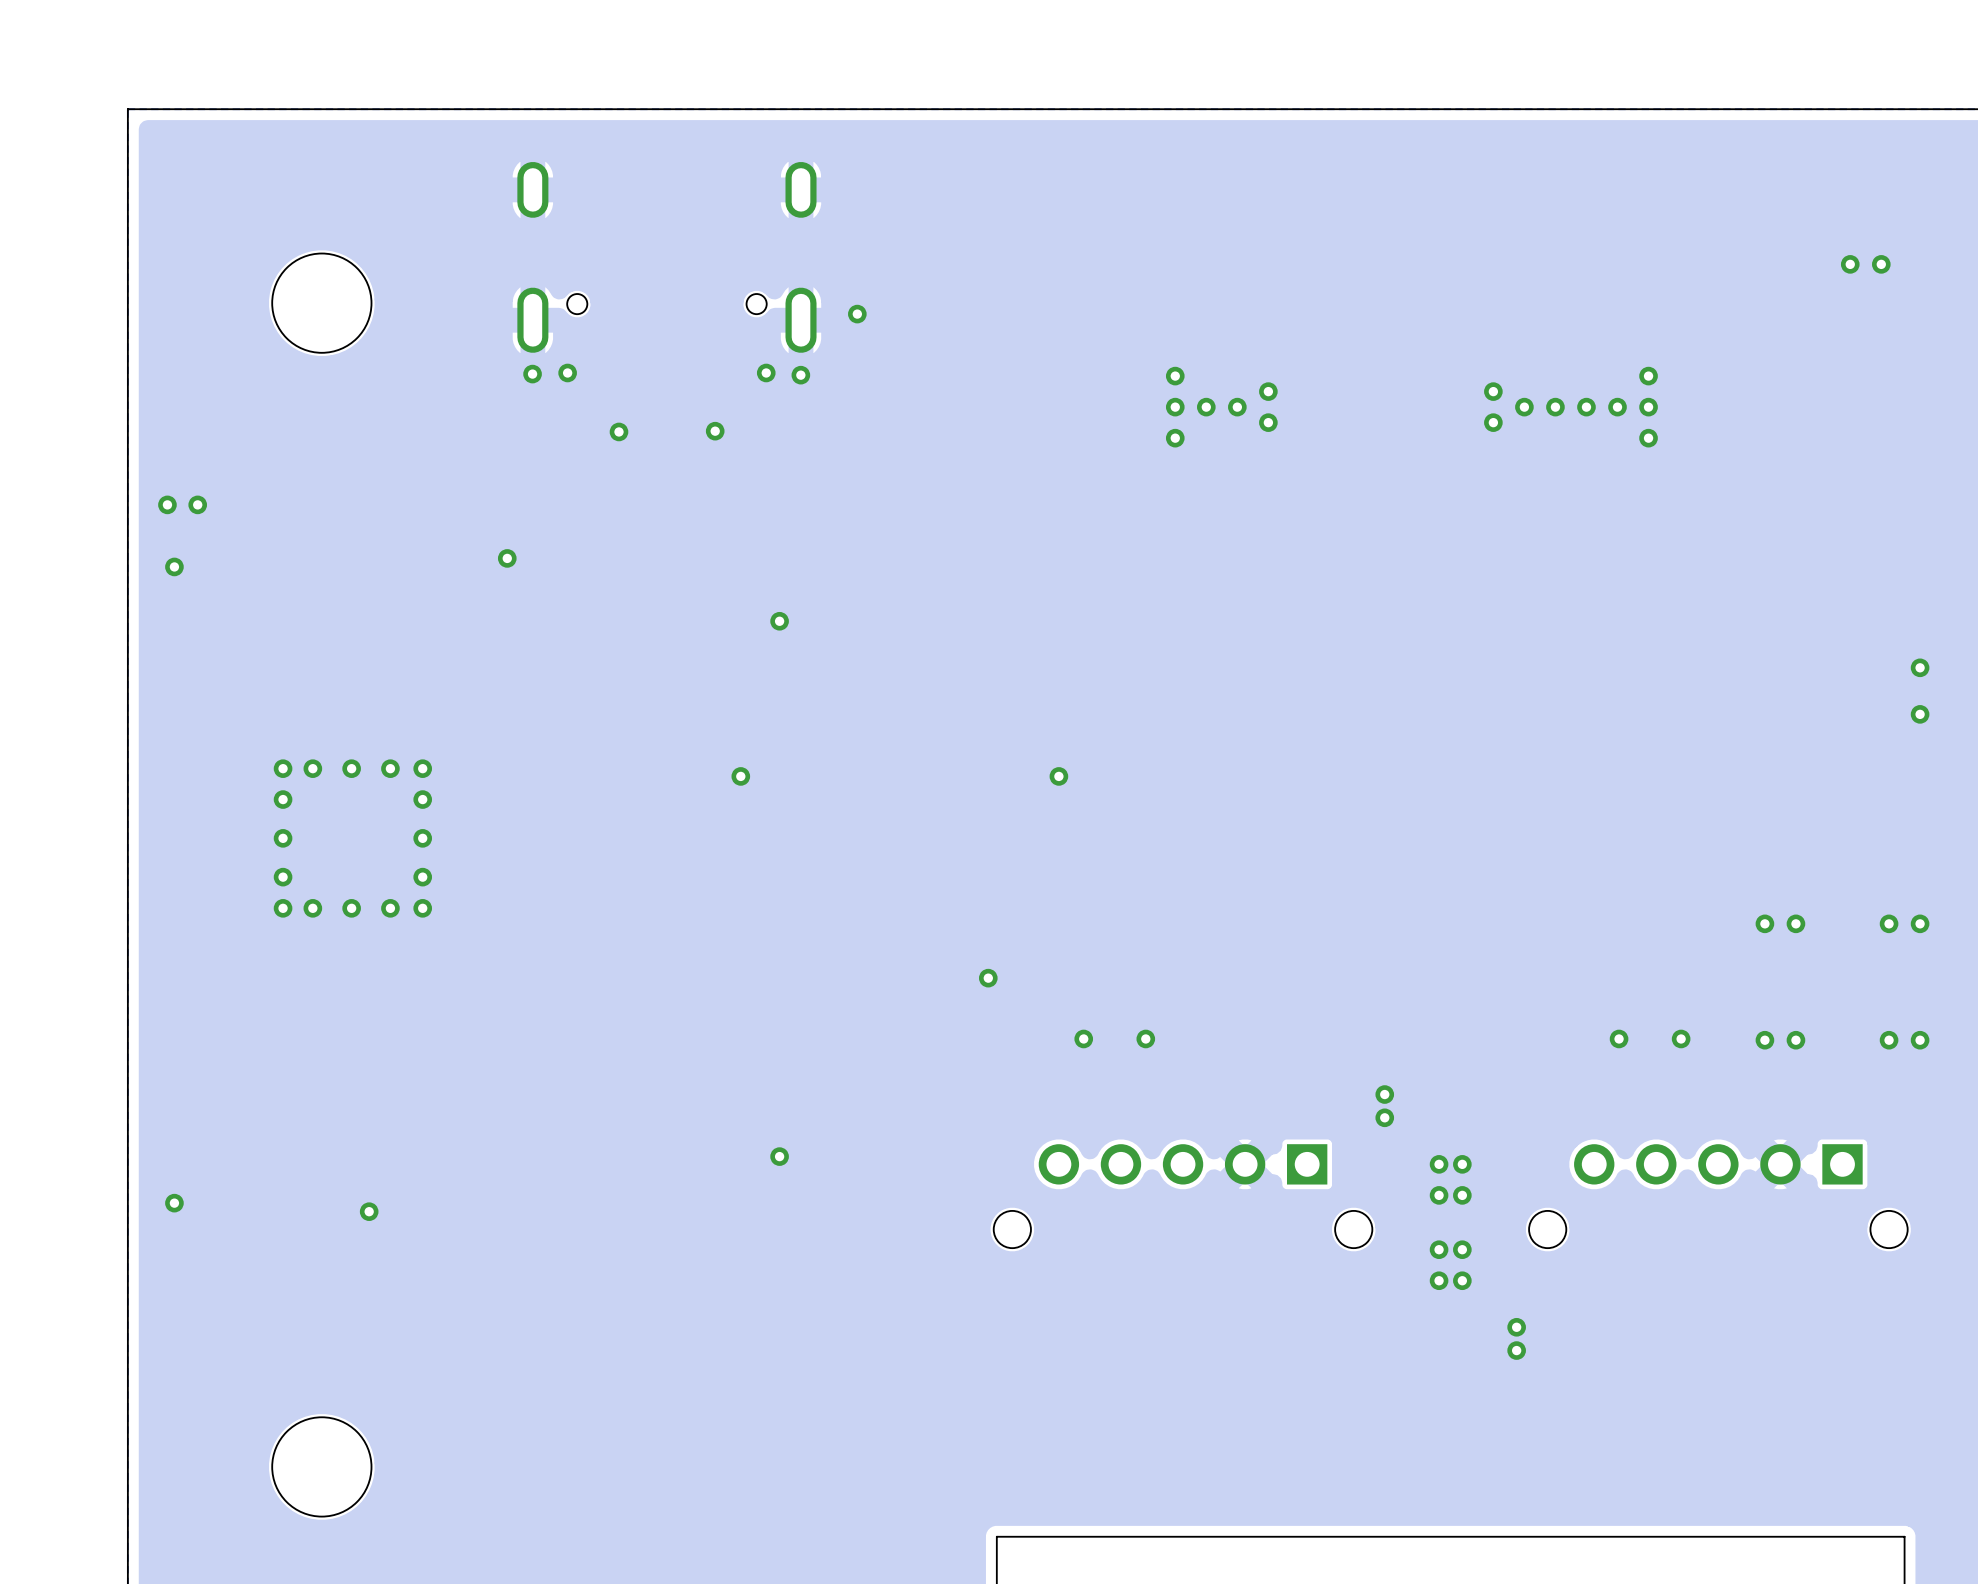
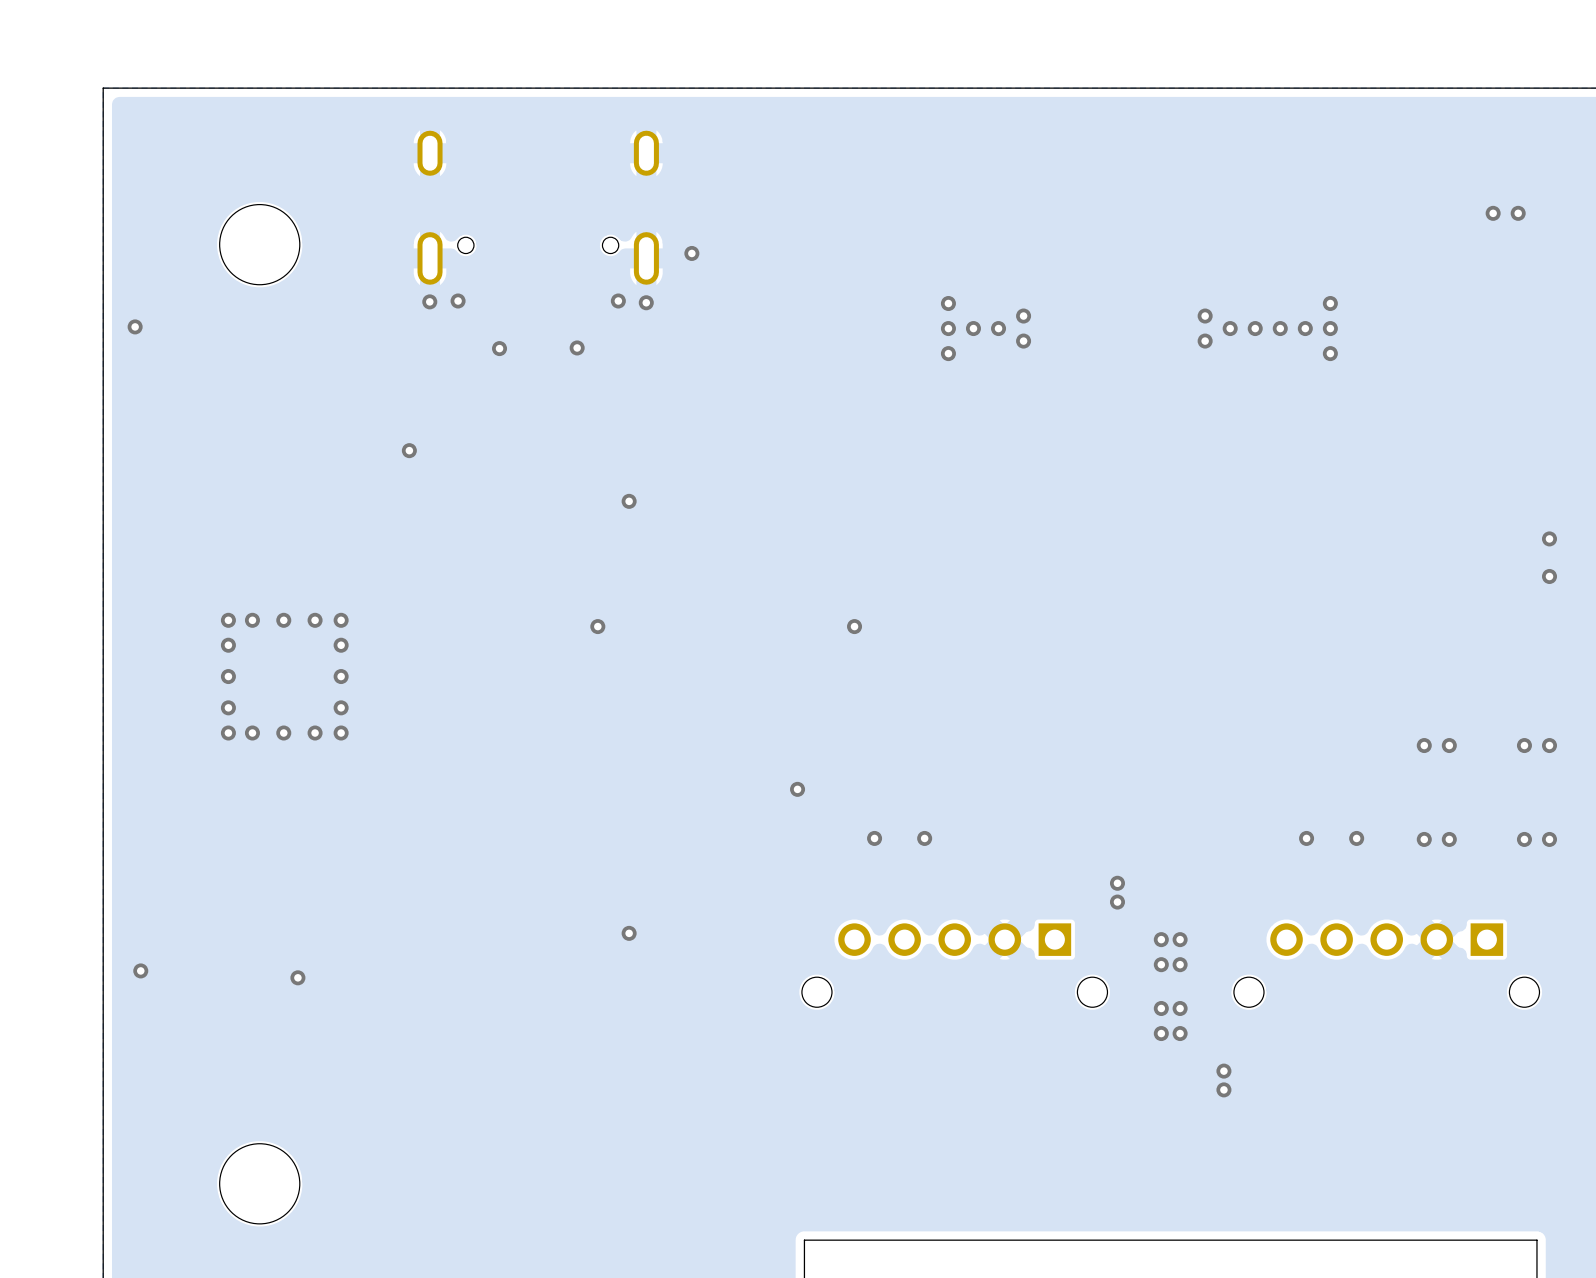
via: none -> (135, 326)
via: (167, 504) -> none
via: (197, 504) -> none
via: (174, 566) -> none

